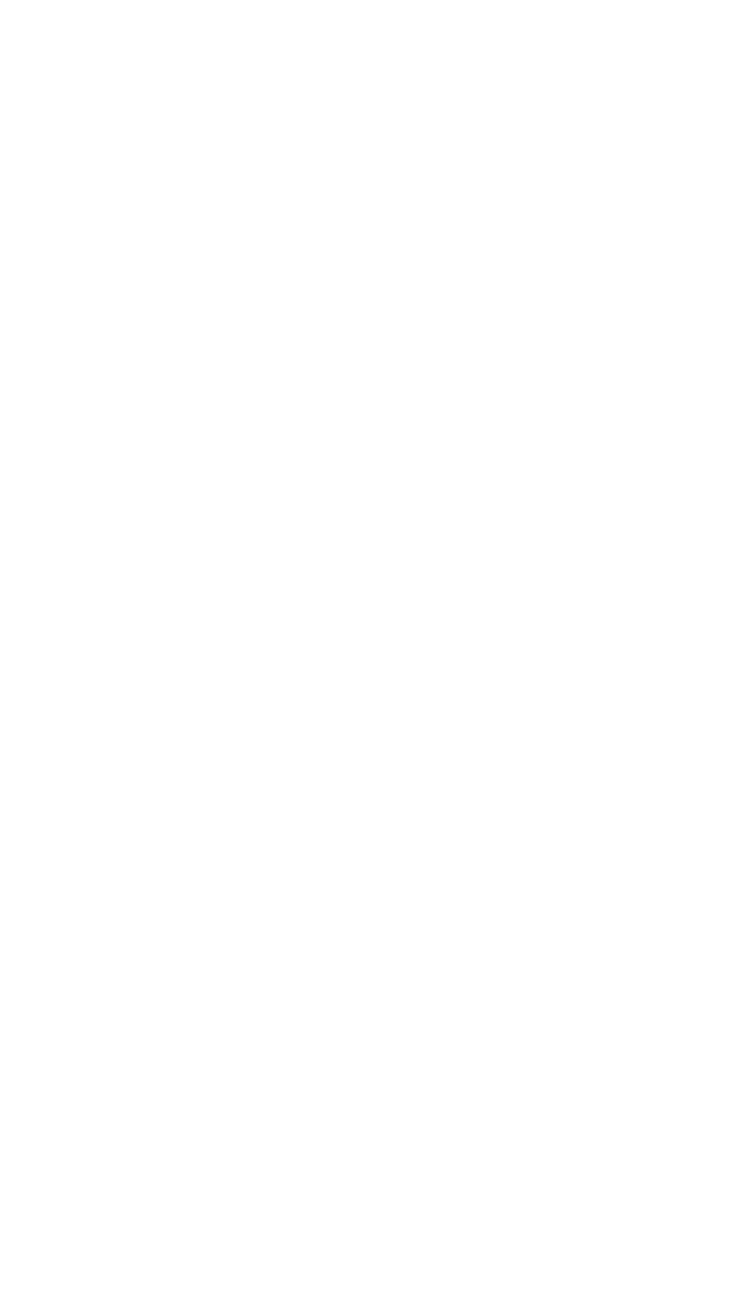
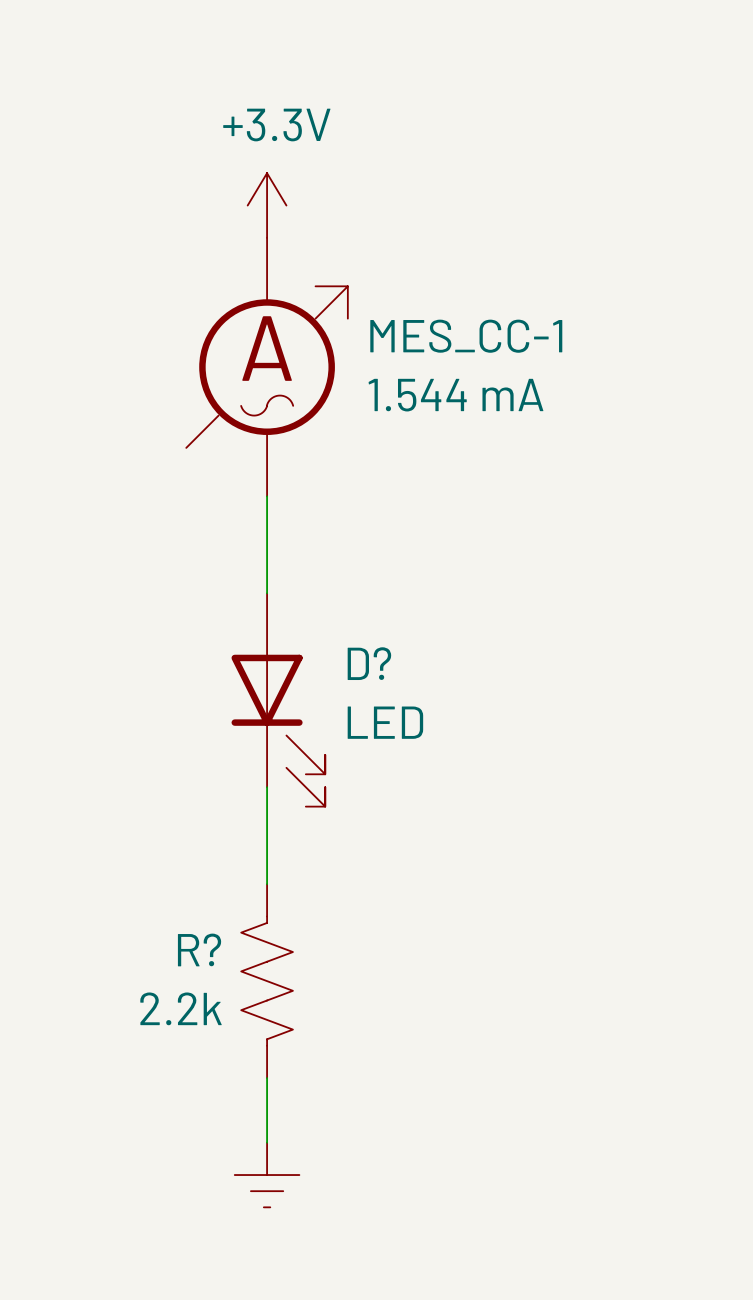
power symbol: none -> +3.3V (267, 205)
MES_CC-1: none -> 1.544 mA (267, 367)
wire: none -> (267, 496) (267, 593)
D?: none -> LED (278, 699)
wire: none -> (267, 787) (267, 884)
R?: none -> 2.2k (267, 981)
wire: none -> (267, 1078) (267, 1142)
power symbol: none -> (267, 1175)

